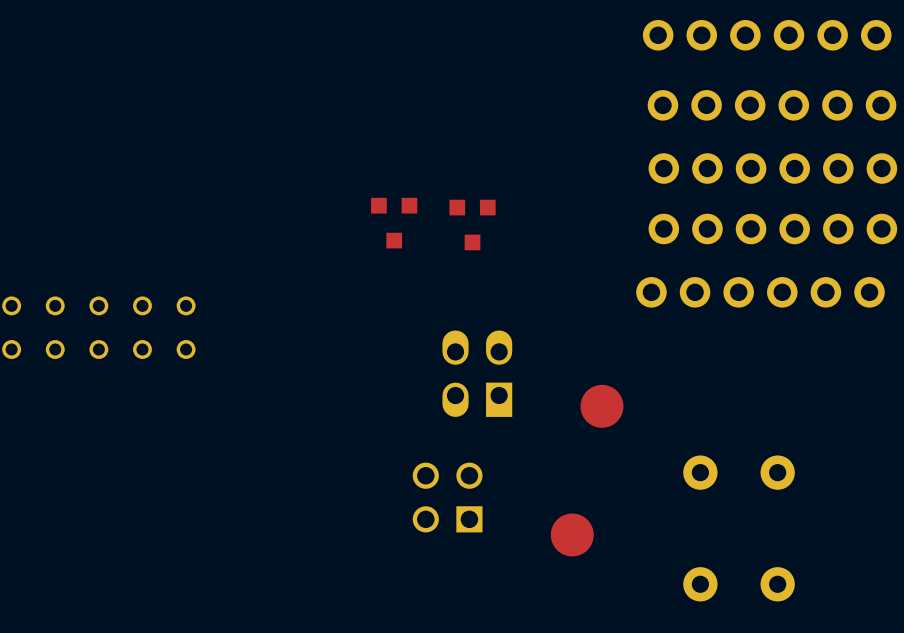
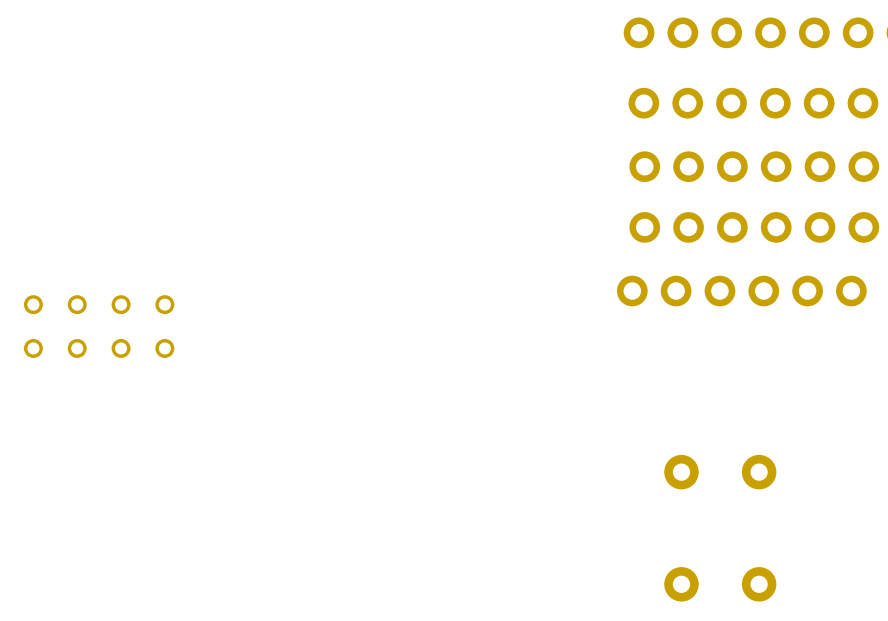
part: (394, 223) -> none
part: (472, 225) -> none
part: (477, 373) -> none
part: (601, 406) -> none
part: (447, 497) -> none
part: (572, 534) -> none

